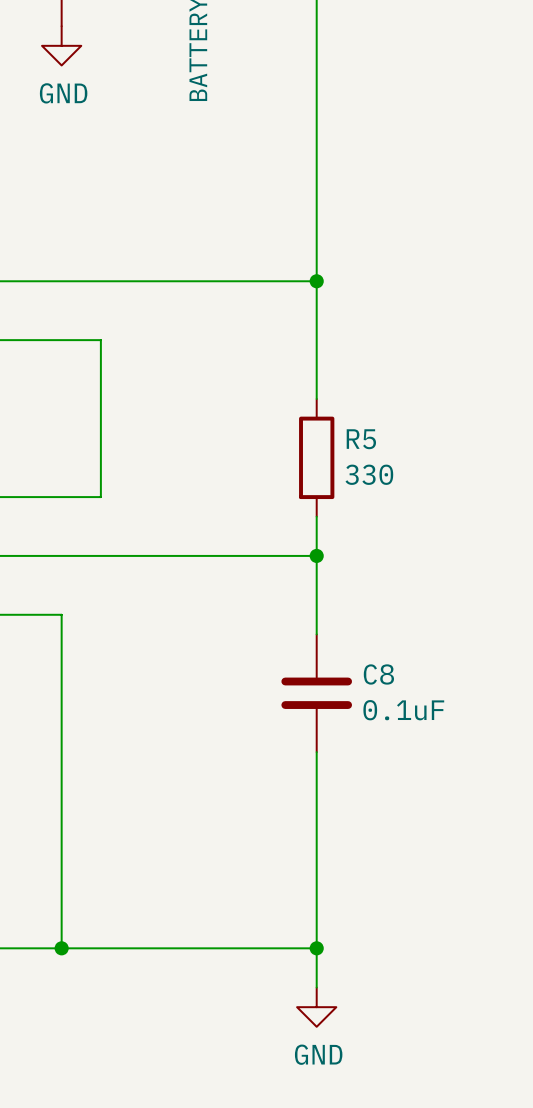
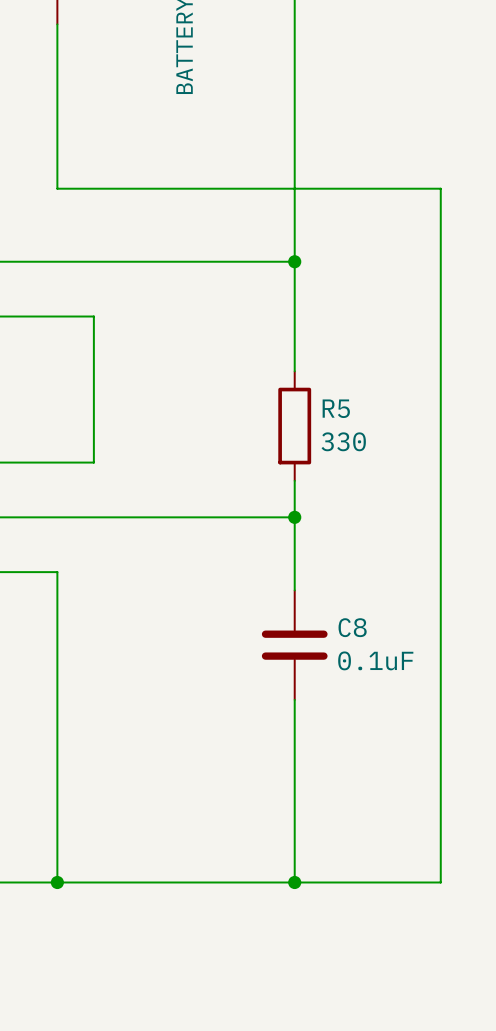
power symbol: GND (61, 45) -> none
wire: (316, 948) (316, 987) -> (294, 882) (440, 882) (440, 188) (57, 188) (57, 24)
power symbol: GND (316, 1007) -> none

